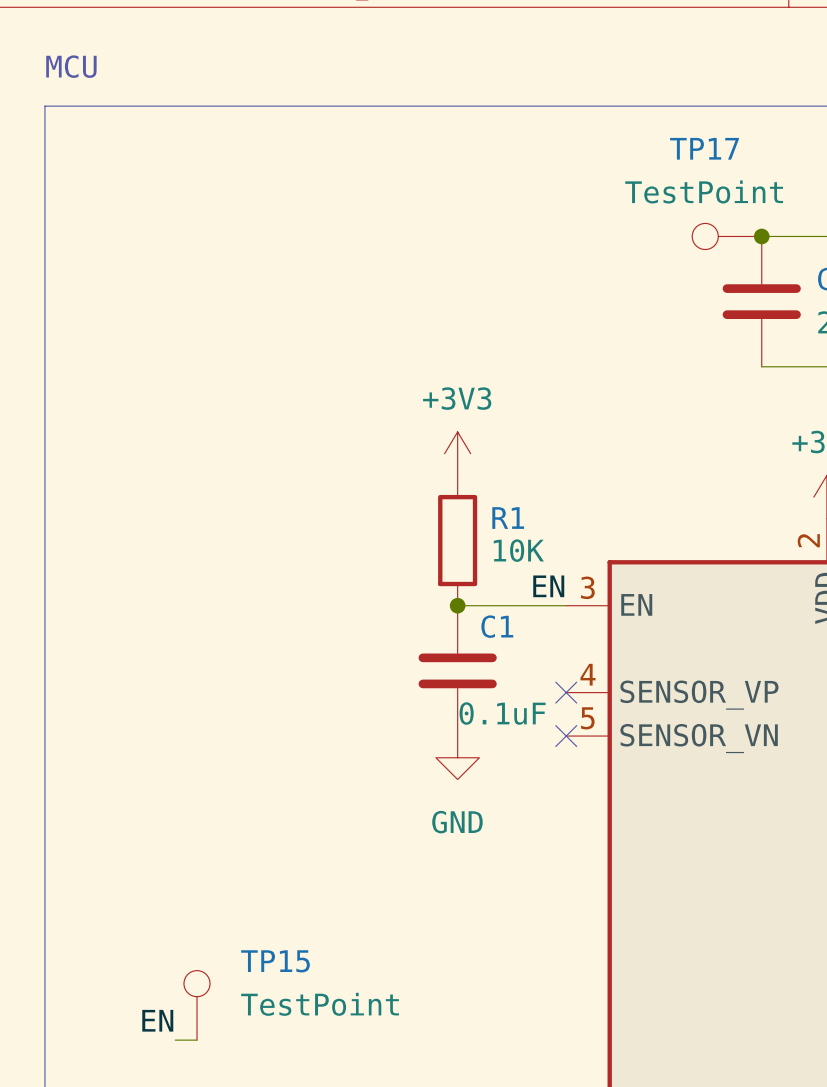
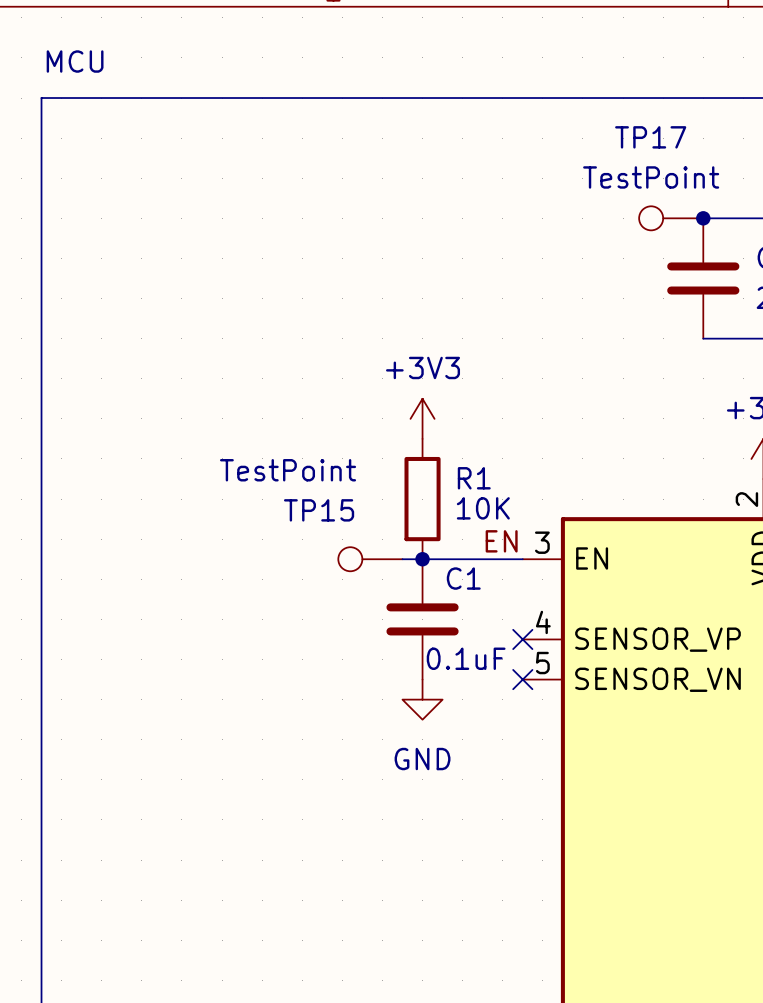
wire: none -> (402, 559) (422, 559)
TP15 name position: TP15 (275, 961) -> TP15 (319, 510)
TP15 rotation: 0° (197, 983) -> 90° counterclockwise (350, 559)
TP15 value position: TestPoint (320, 1004) -> TestPoint (288, 470)
TP15 position: (197, 1005) -> (370, 559)
label: EN (157, 1020) -> none
wire: (175, 1040) (197, 1040) -> none

